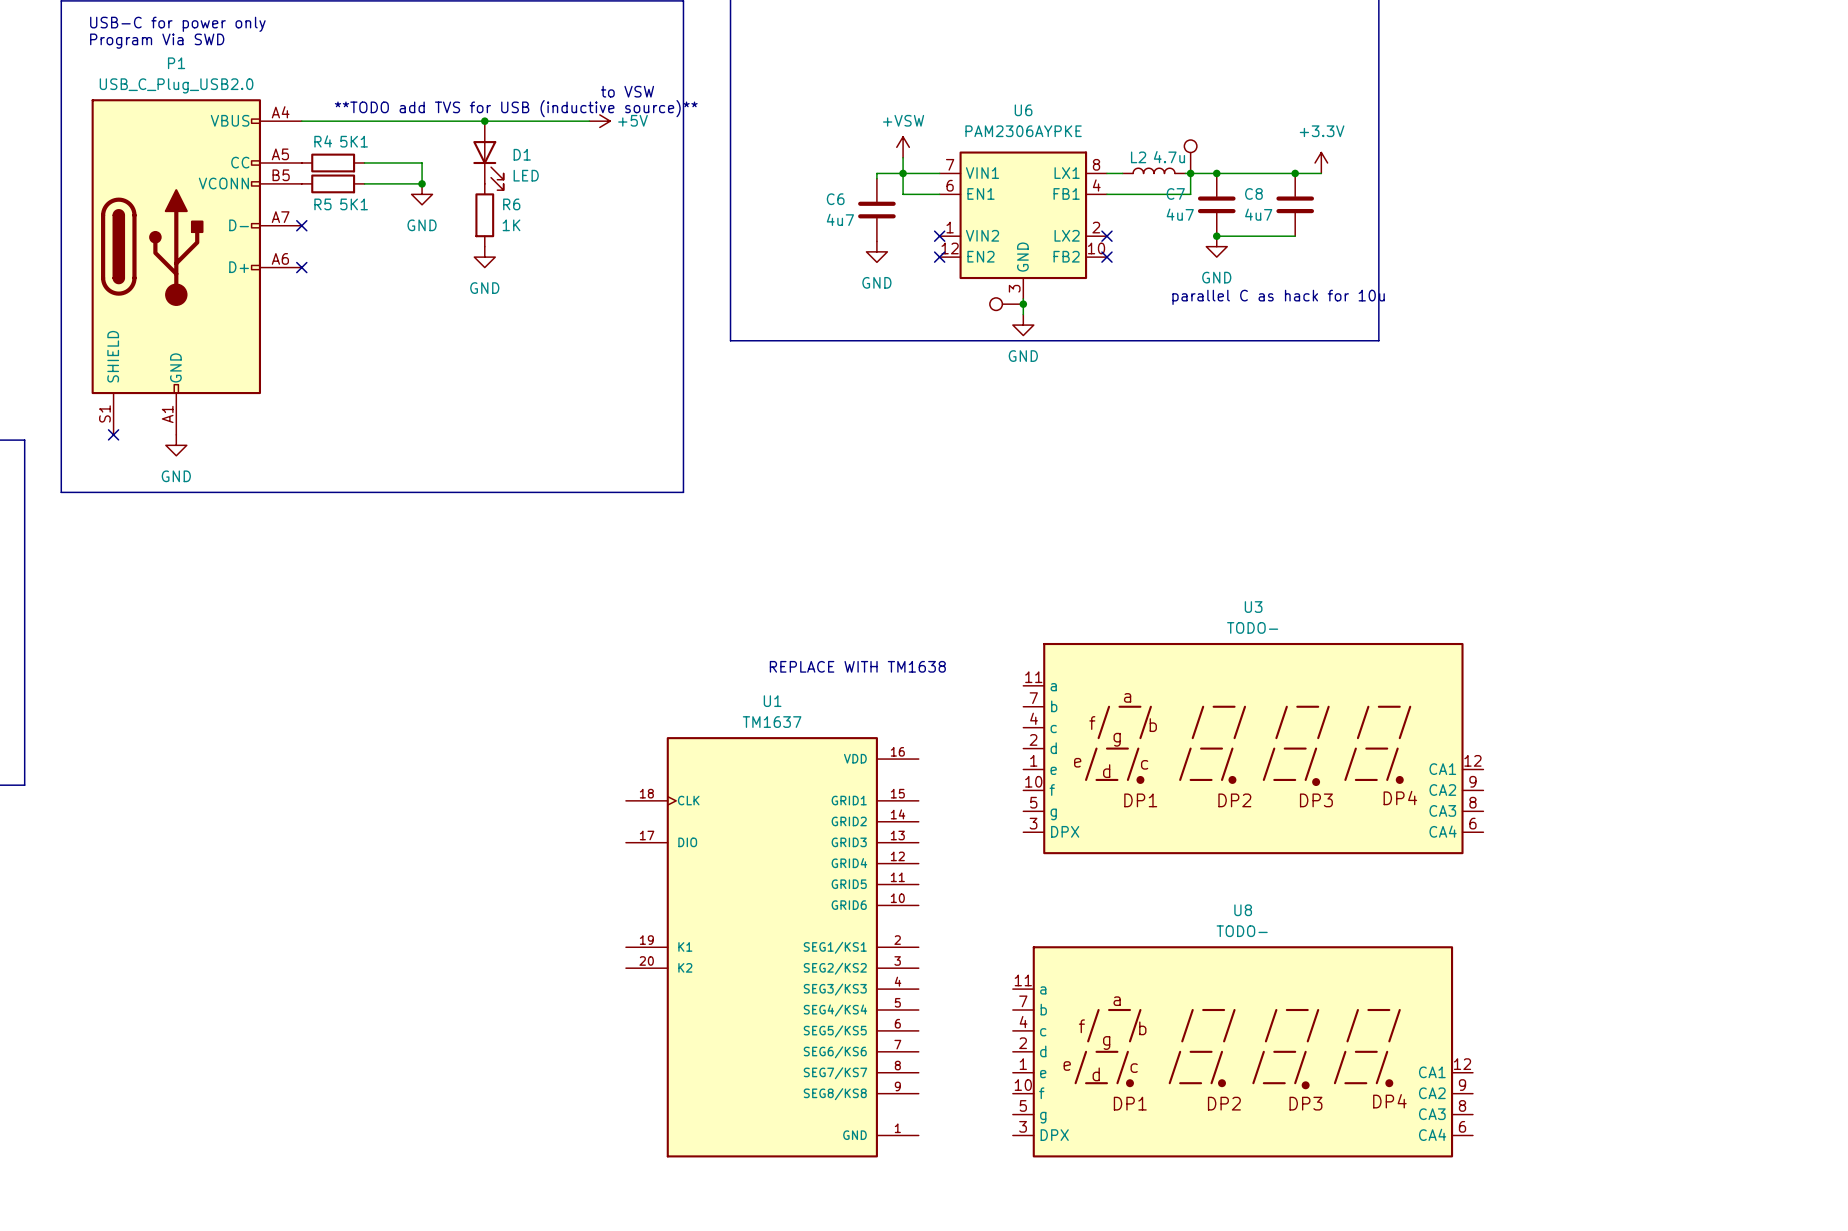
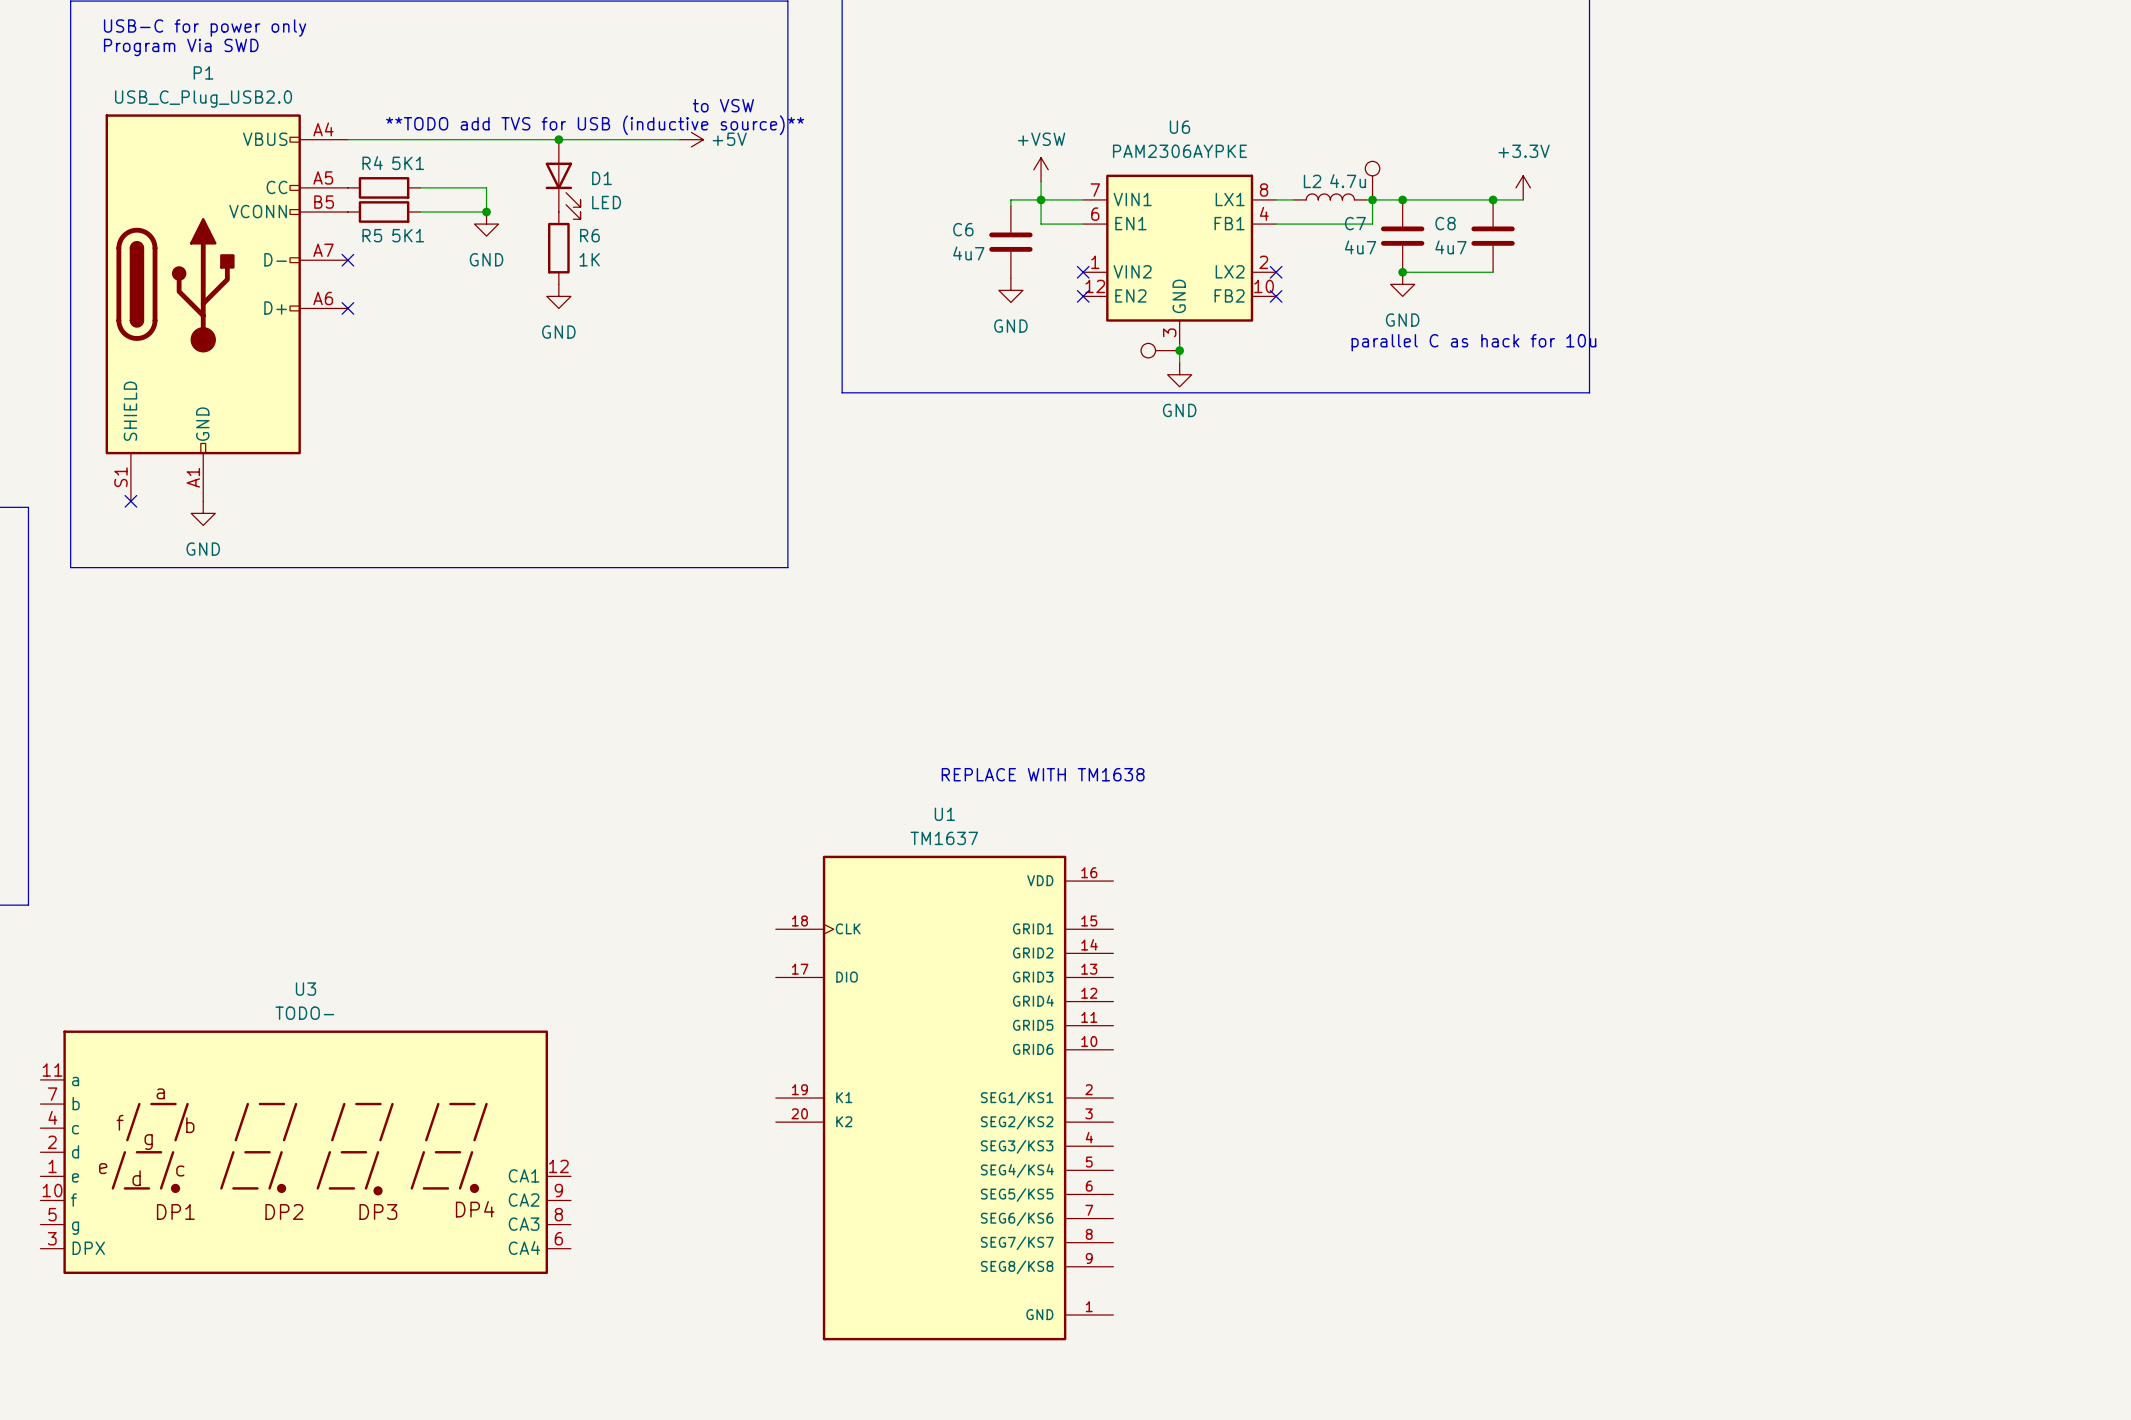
text position: REPLACE WITH TM1638 (857, 666) -> REPLACE WITH TM1638 (1043, 774)
U3 position: (1253, 748) -> (305, 1152)
U1 position: (772, 947) -> (944, 1098)
U8: TODO- (1242, 1051) -> none

